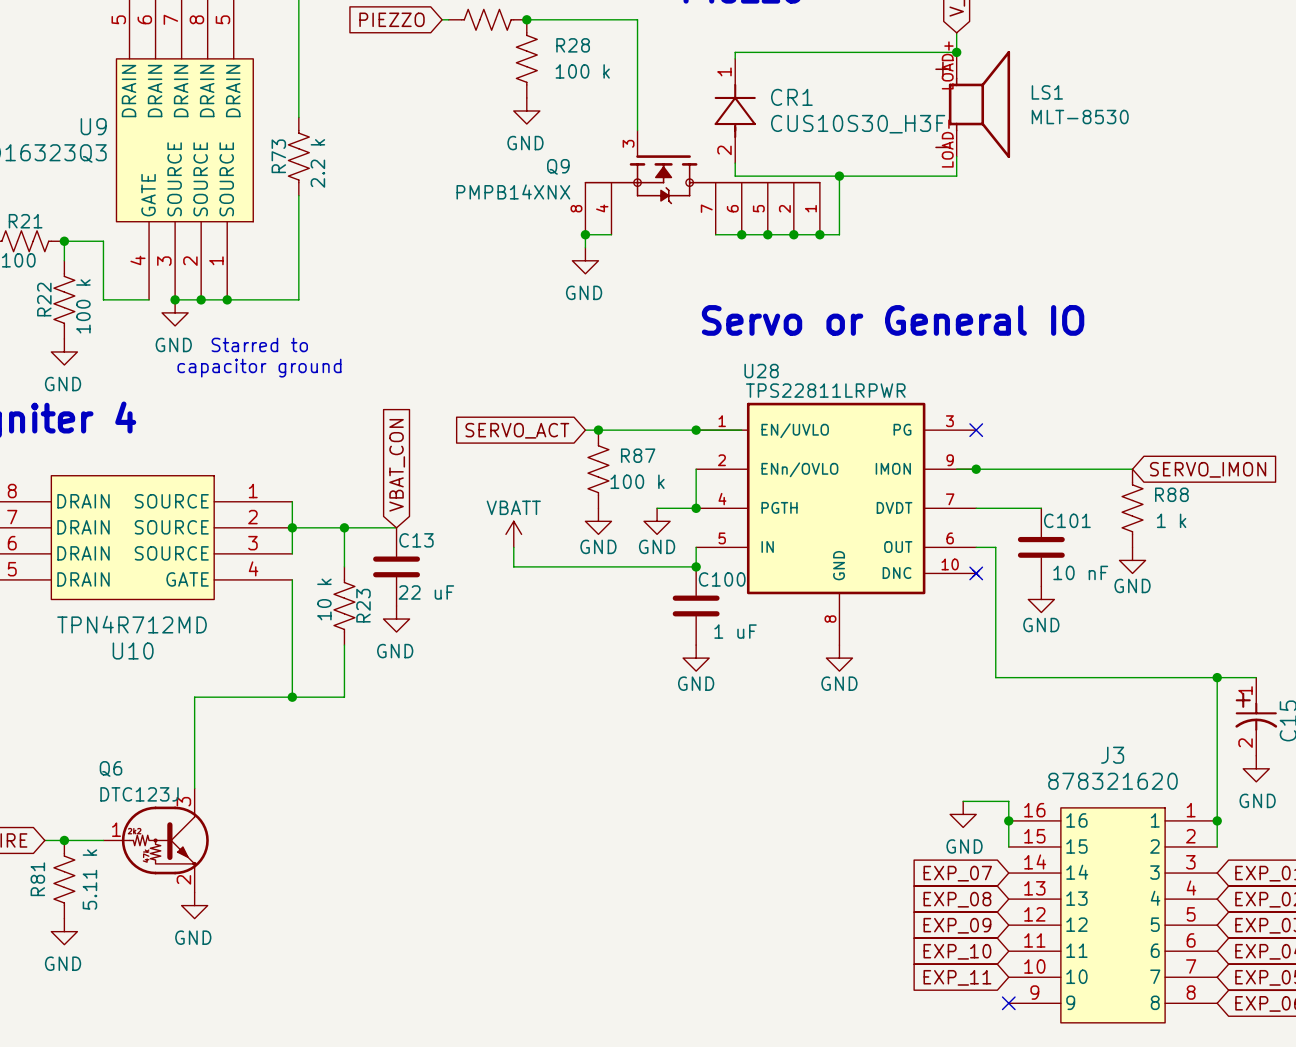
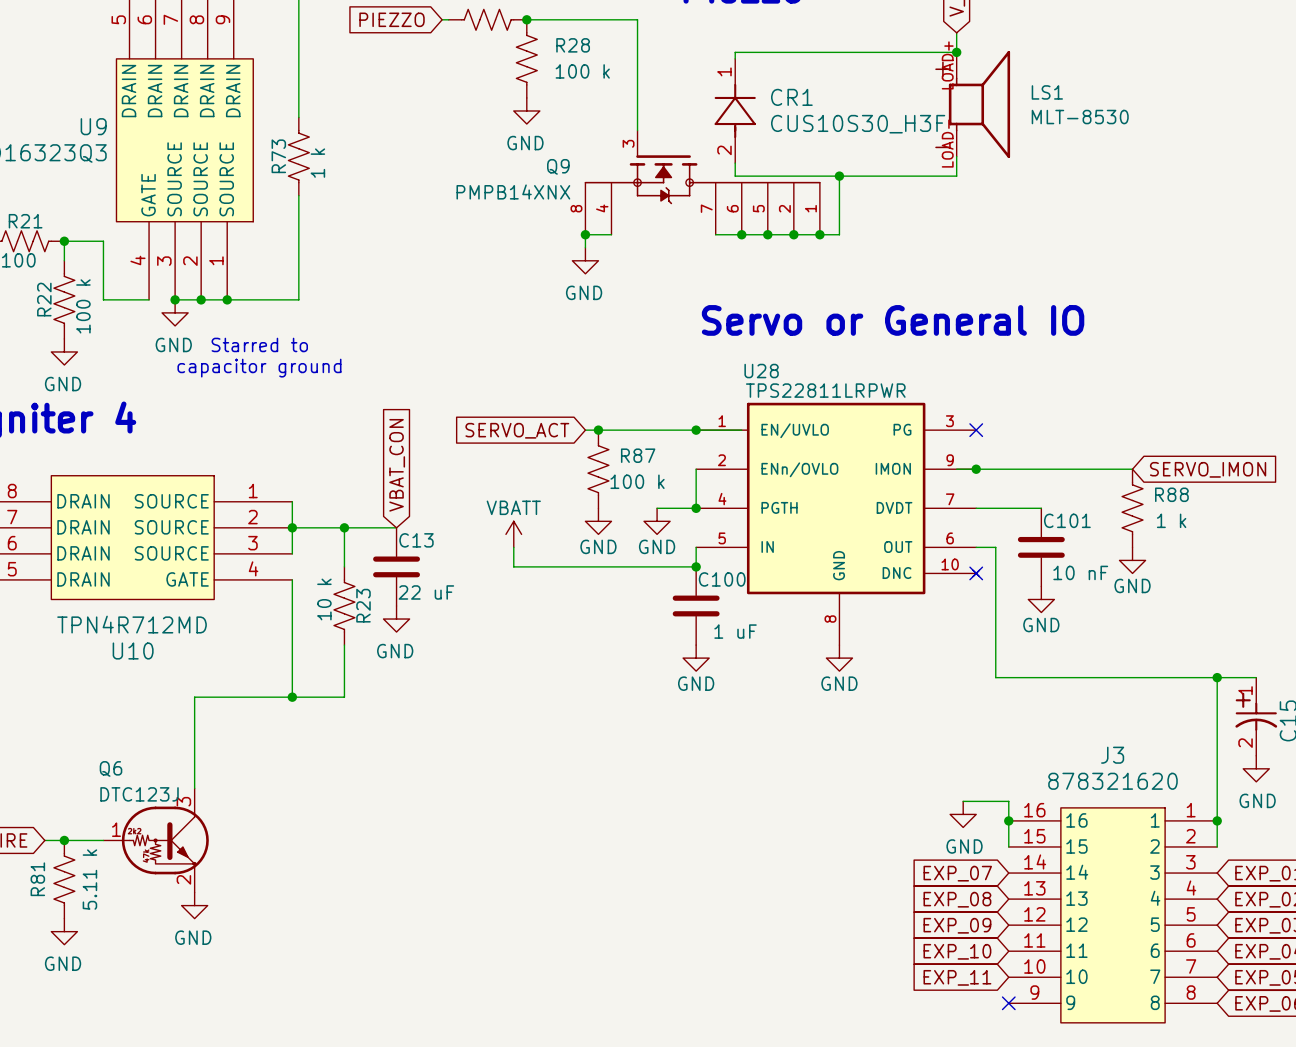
U9 pin number: 5 (222, 19) -> 9 (222, 19)
R73 value: 2.2 k (317, 163) -> 1 k (317, 163)

